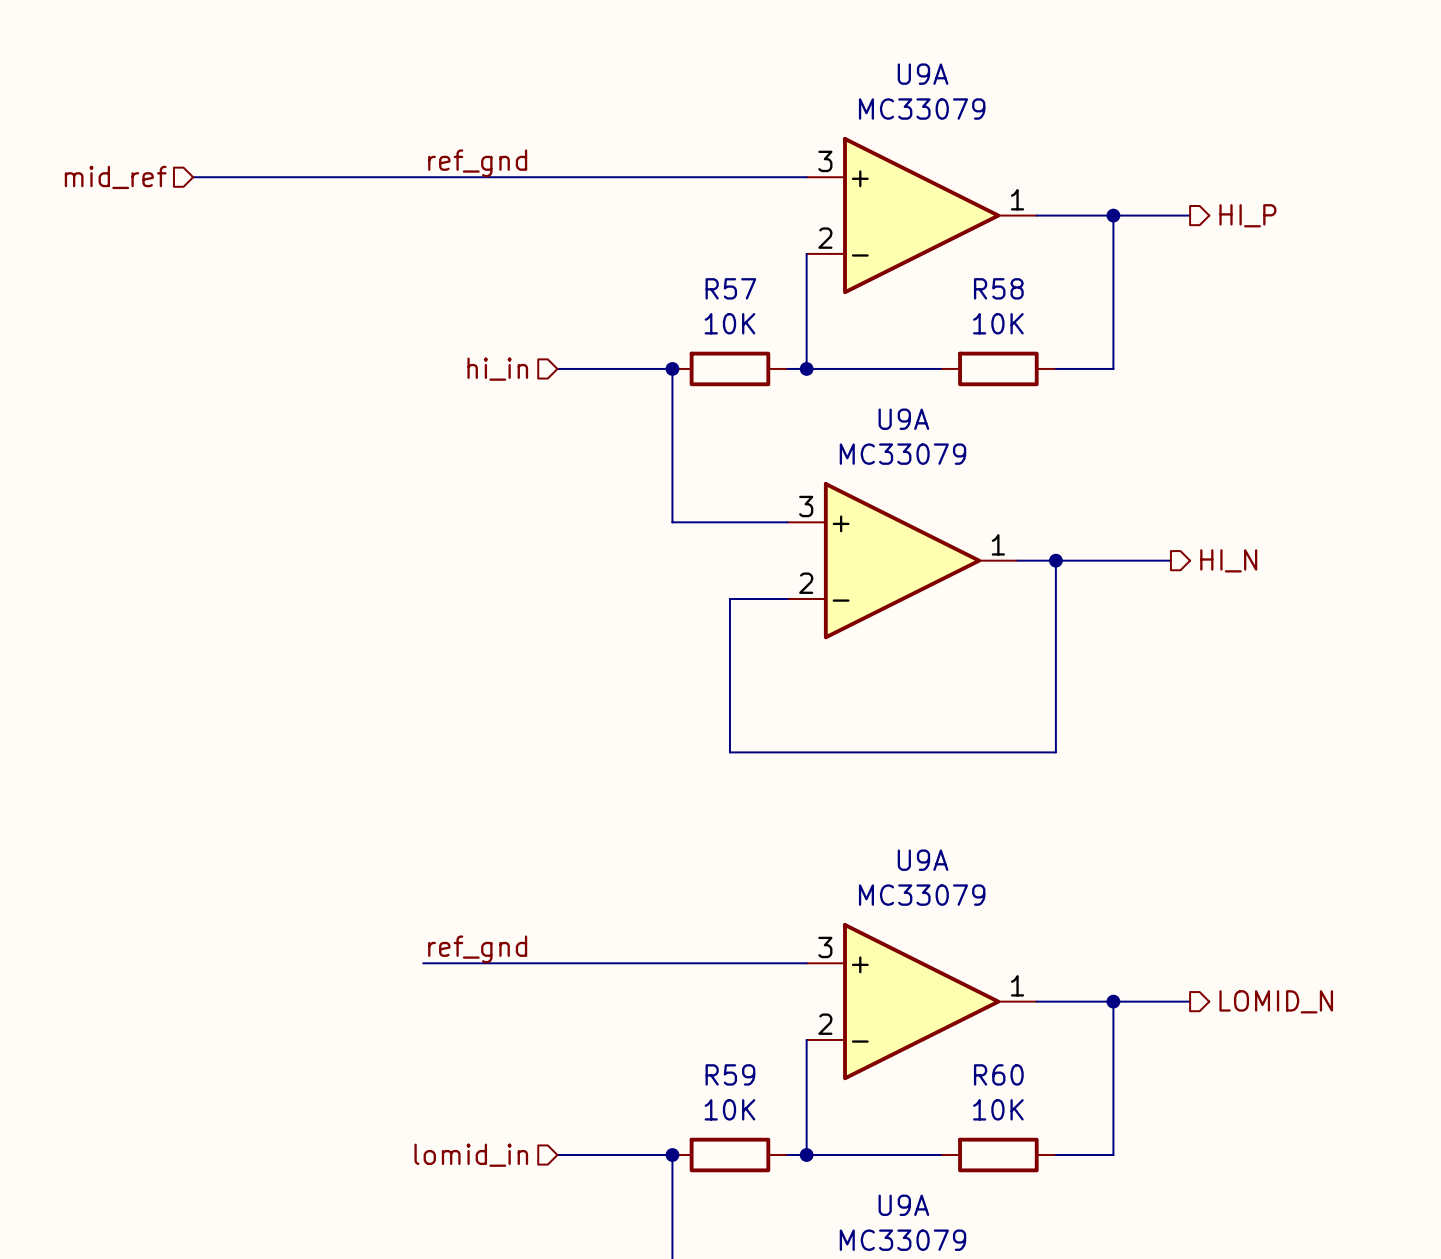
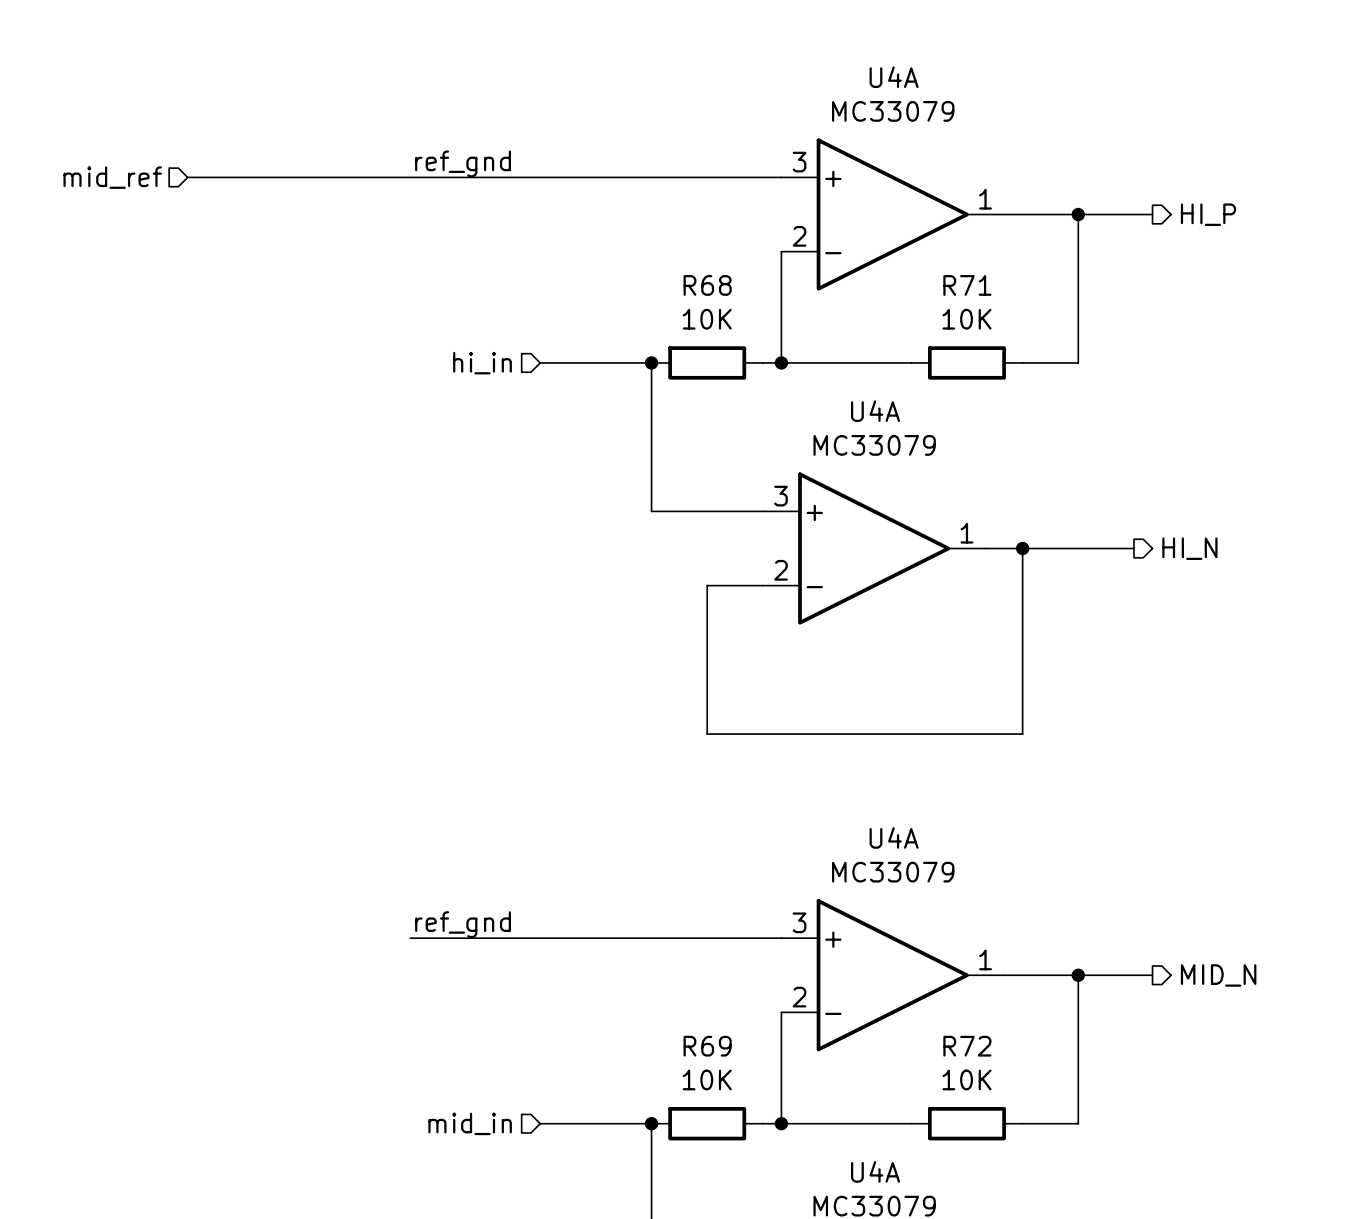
U9A name: U9A (923, 74) -> U4A (894, 77)
R57 name: R57 (730, 288) -> R68 (707, 285)
R58 name: R58 (998, 288) -> R71 (967, 285)
U9A name: U9A (903, 419) -> U4A (875, 411)
U9A name: U9A (923, 860) -> U4A (894, 837)
hierarchical label: LOMID_N (1276, 1001) -> MID_N (1218, 975)
R59 name: R59 (730, 1074) -> R69 (707, 1046)
R60 name: R60 (998, 1074) -> R72 (967, 1046)
hierarchical label: lomid_in (471, 1155) -> mid_in (470, 1123)
U9A name: U9A (903, 1205) -> U4A (875, 1171)

